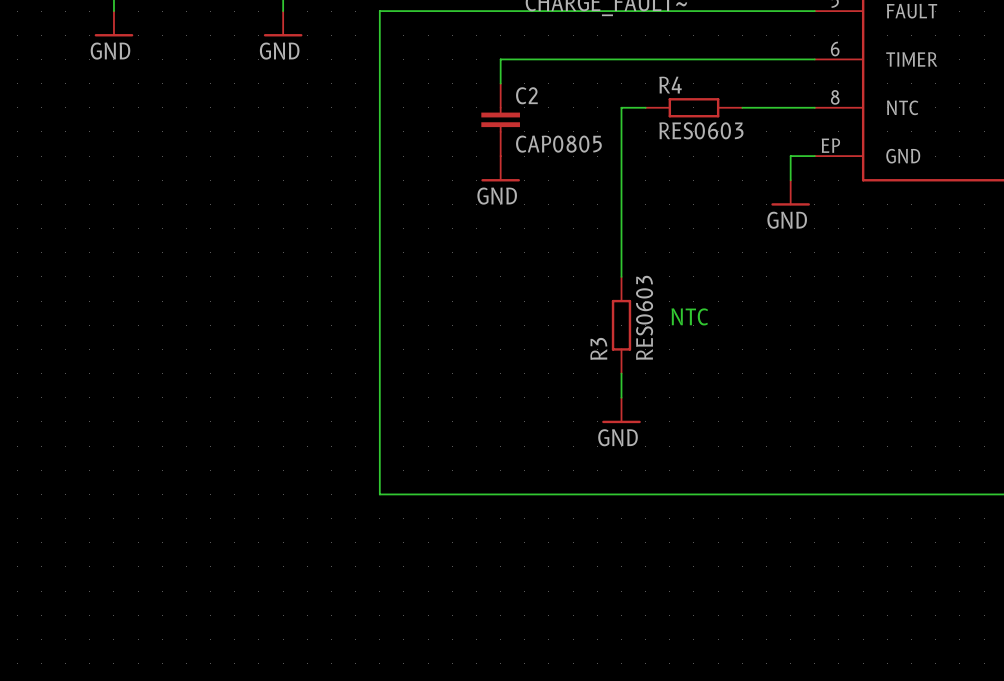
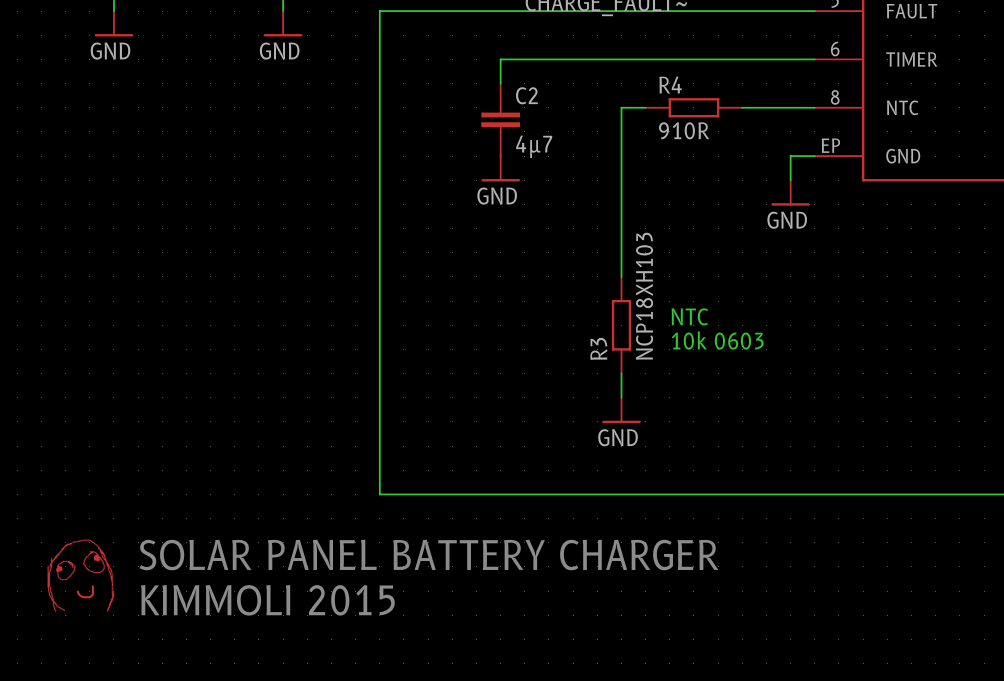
R4 value: RES0603 (701, 130) -> 910R (684, 130)
C2 value: CAP0805 (558, 144) -> 4µ7 (534, 146)
R3 value: RES0603 (644, 317) -> NCP18XH103 (644, 296)
text: none -> 10k 0603 (717, 340)
text: none -> SOLAR PANEL BATTERY CHARGER (428, 555)
part: none -> (80, 575)
text: none -> KIMMOLI 2015 (267, 600)

